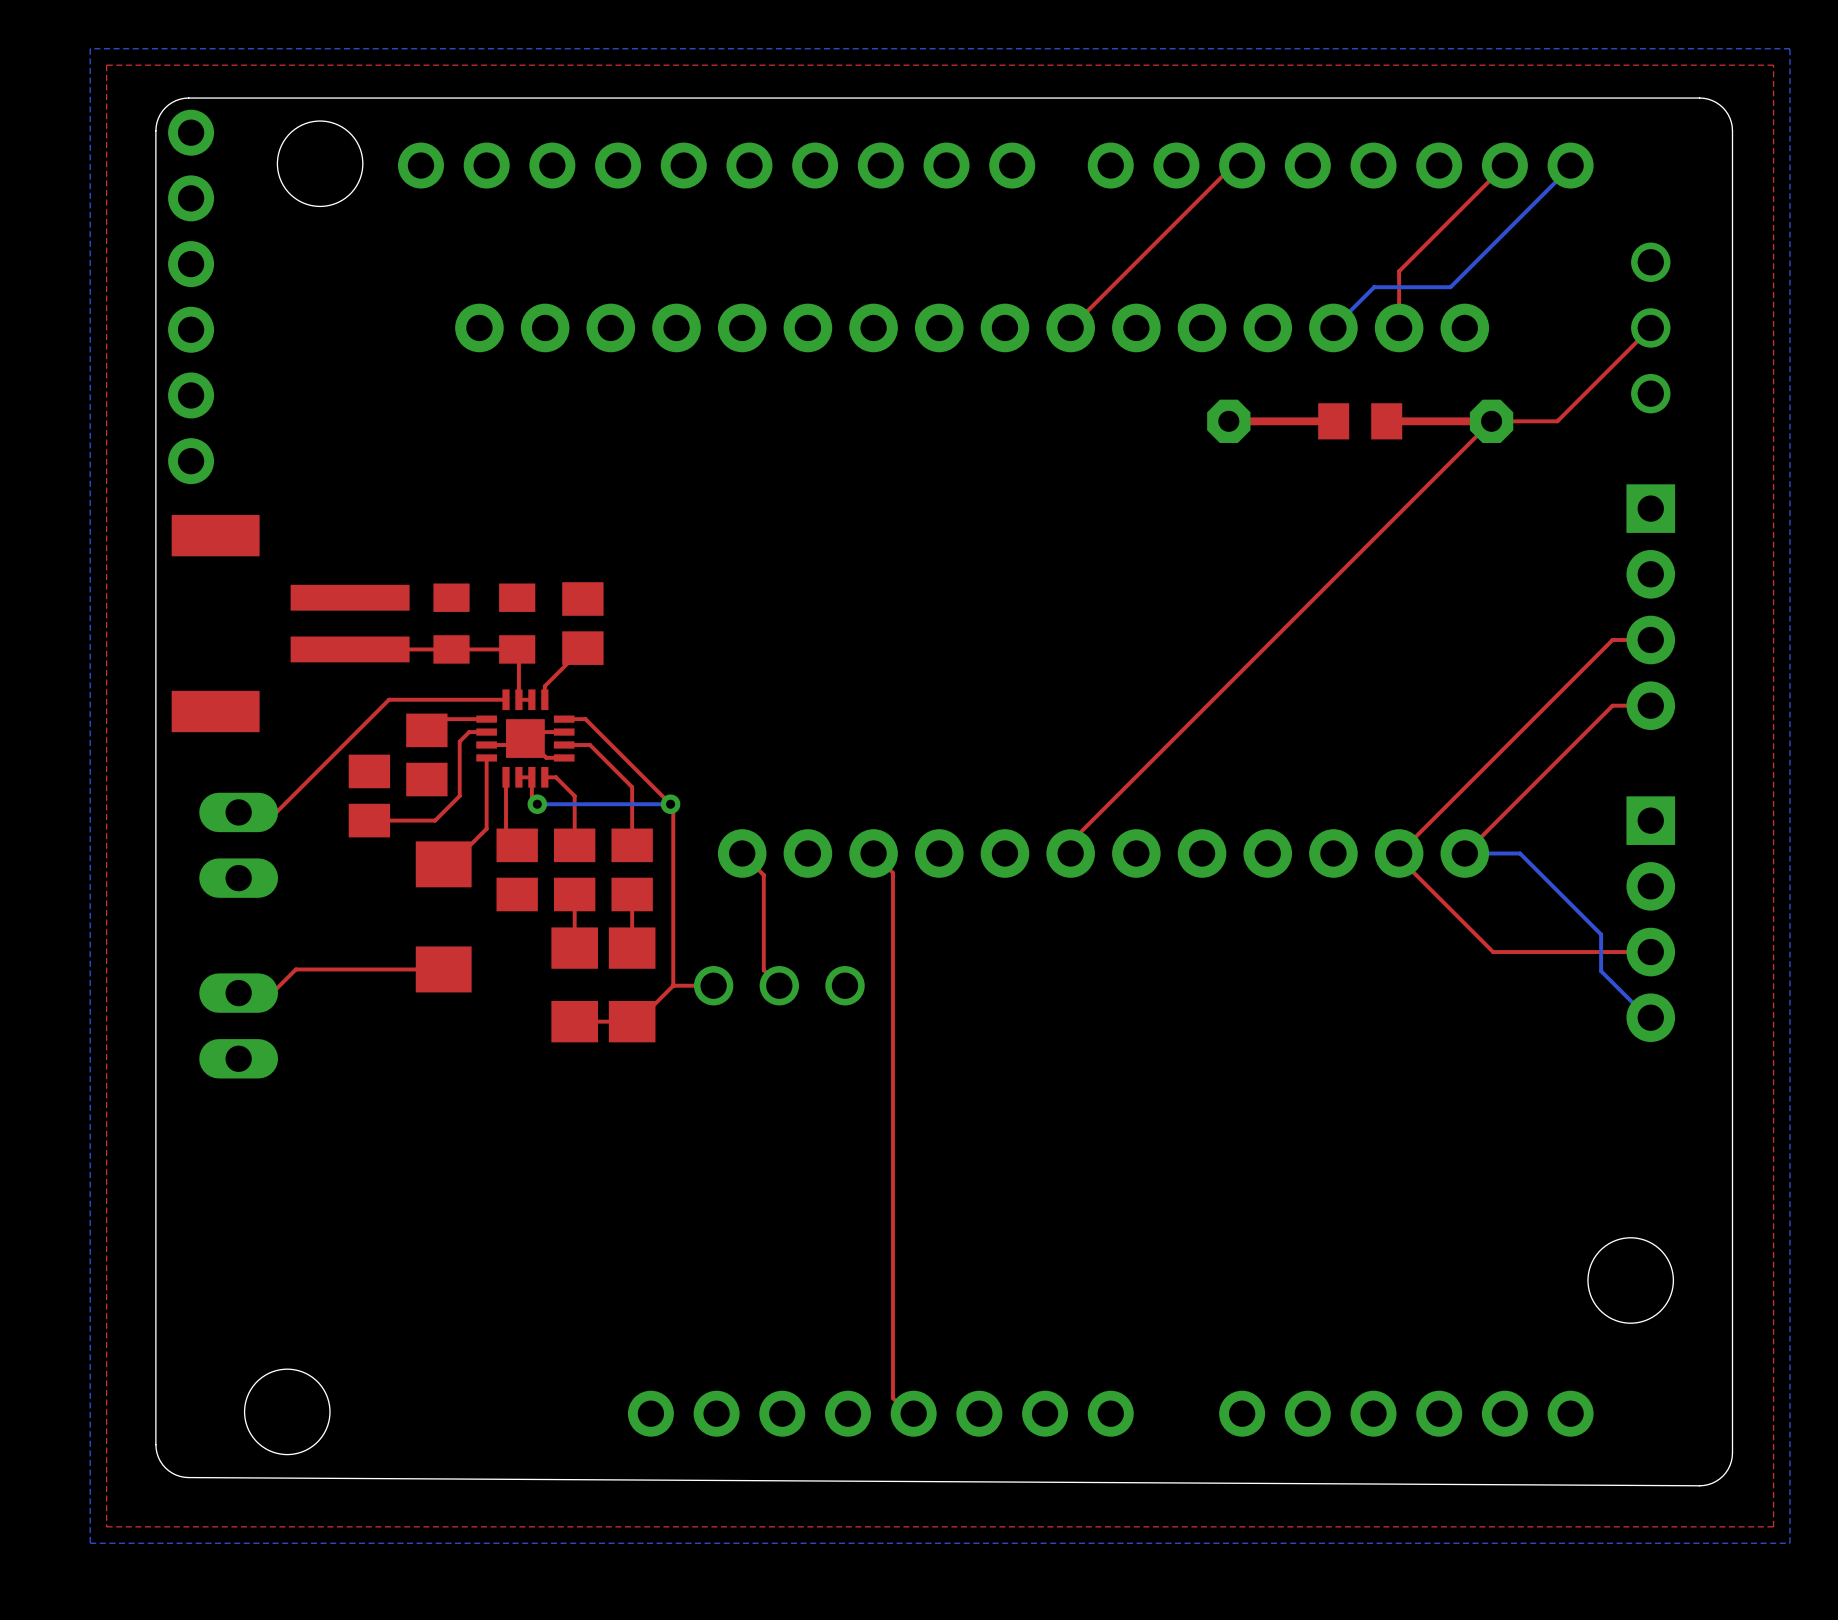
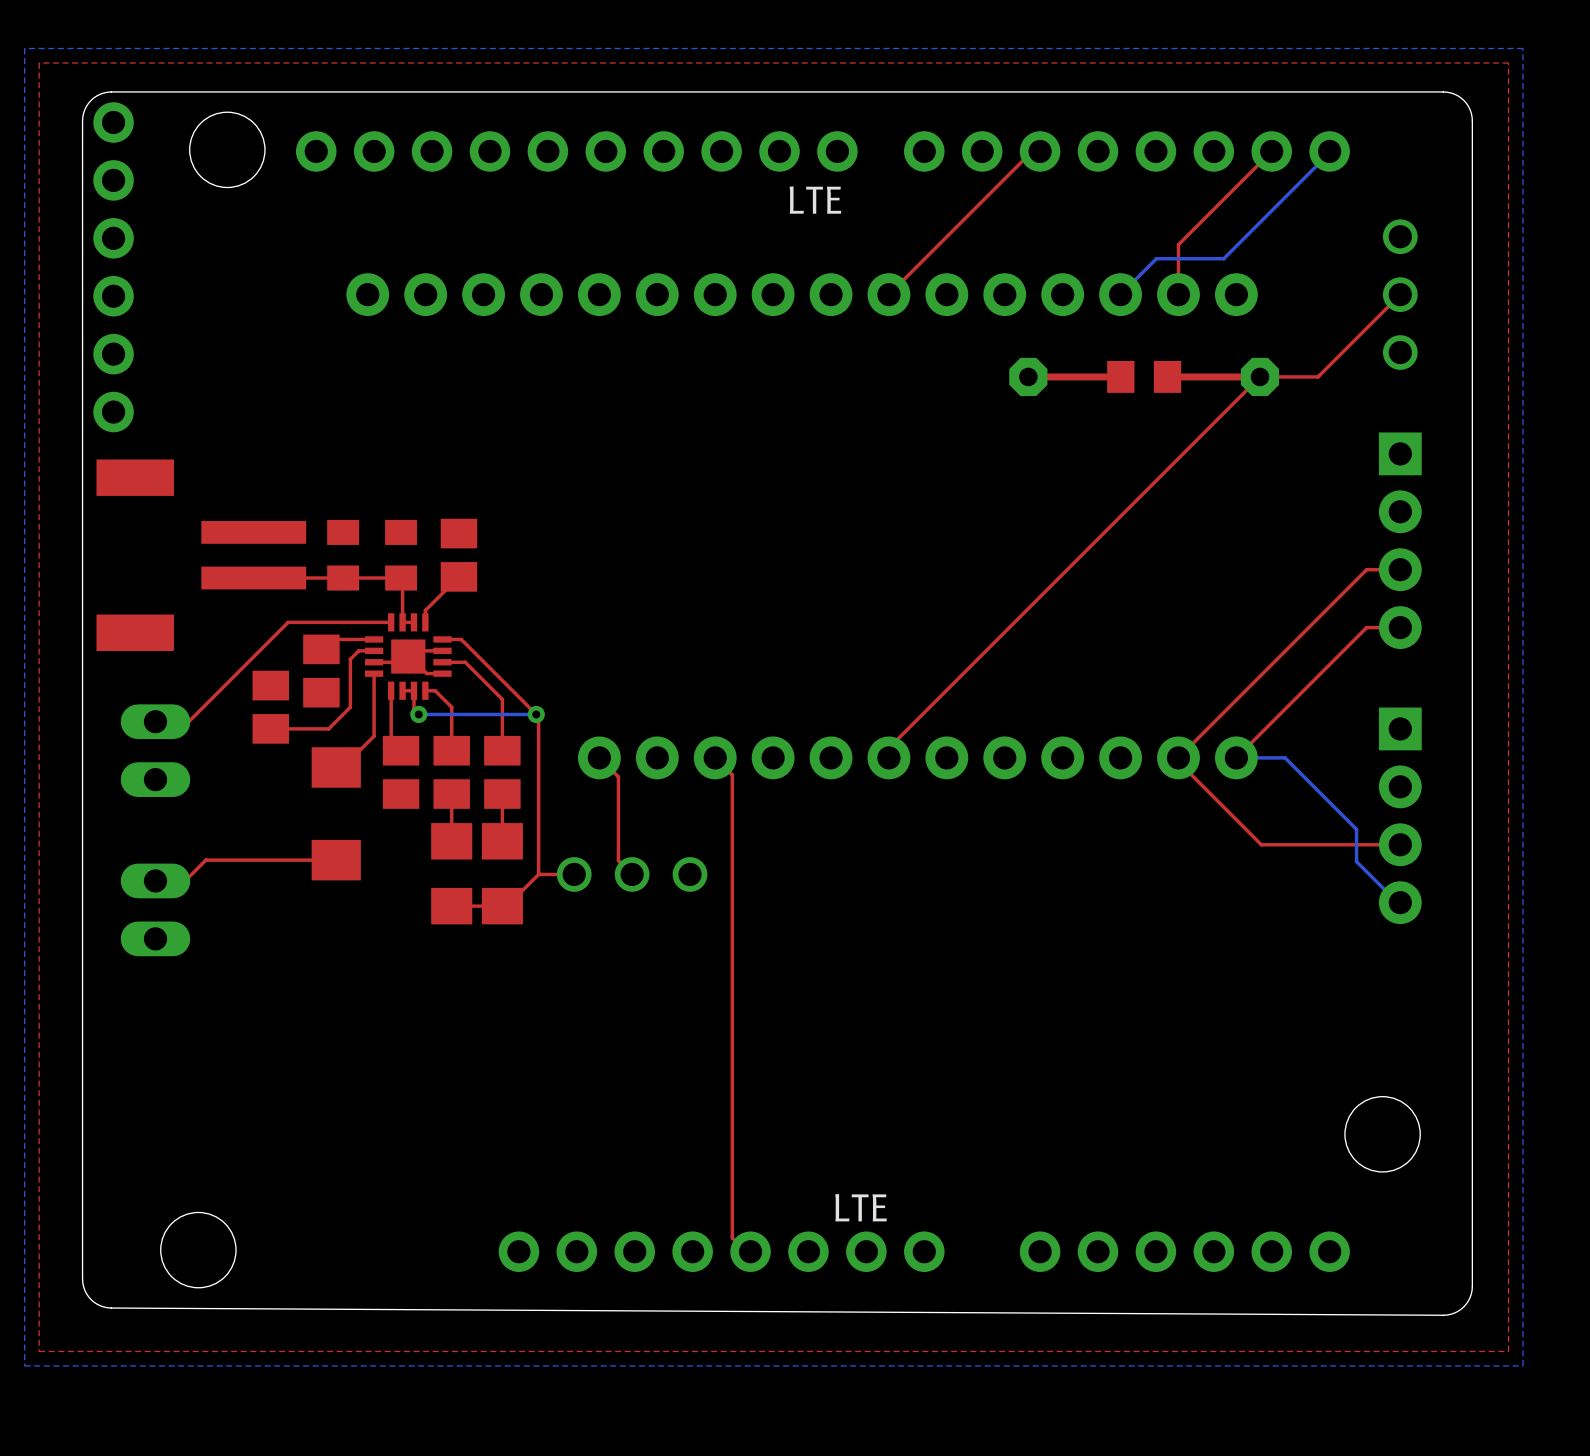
text: none -> LTE (815, 200)
text: none -> LTE (861, 1207)

